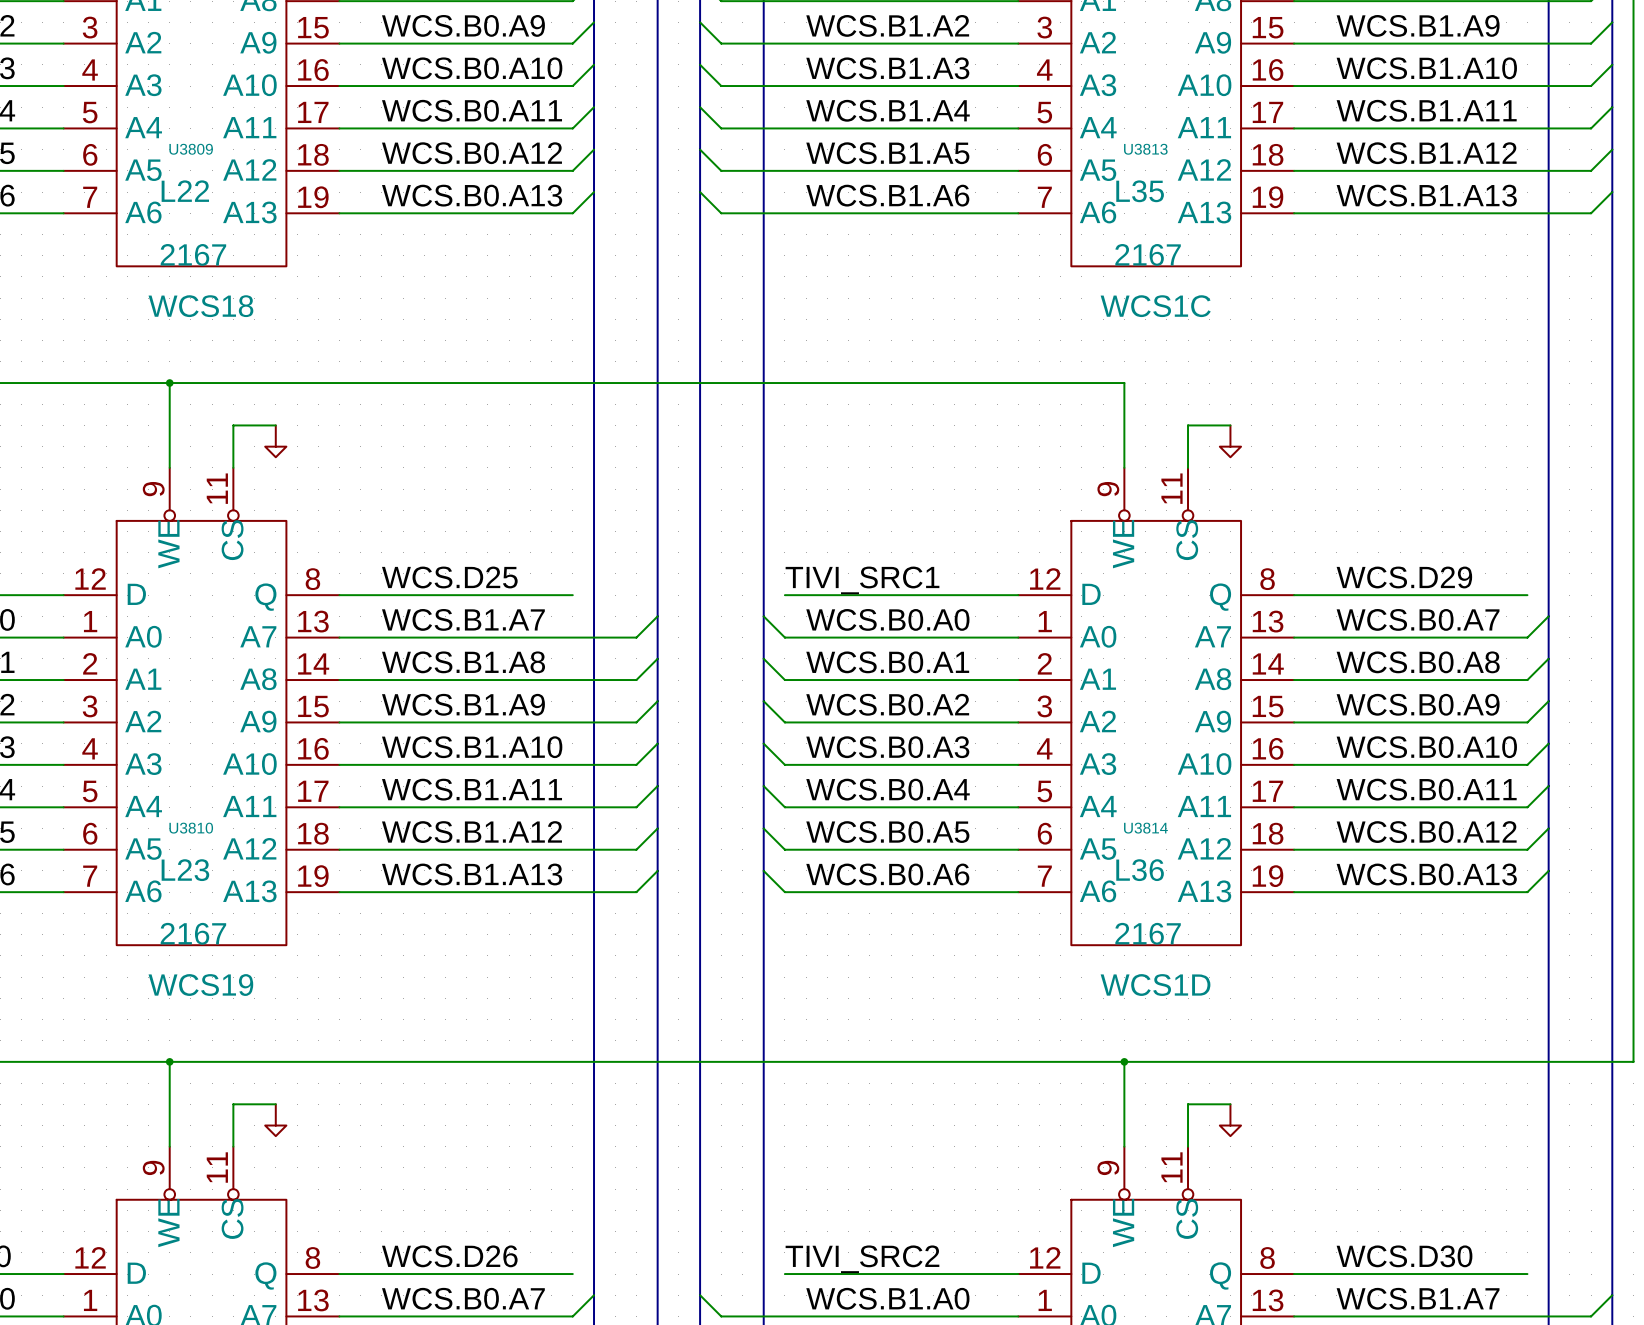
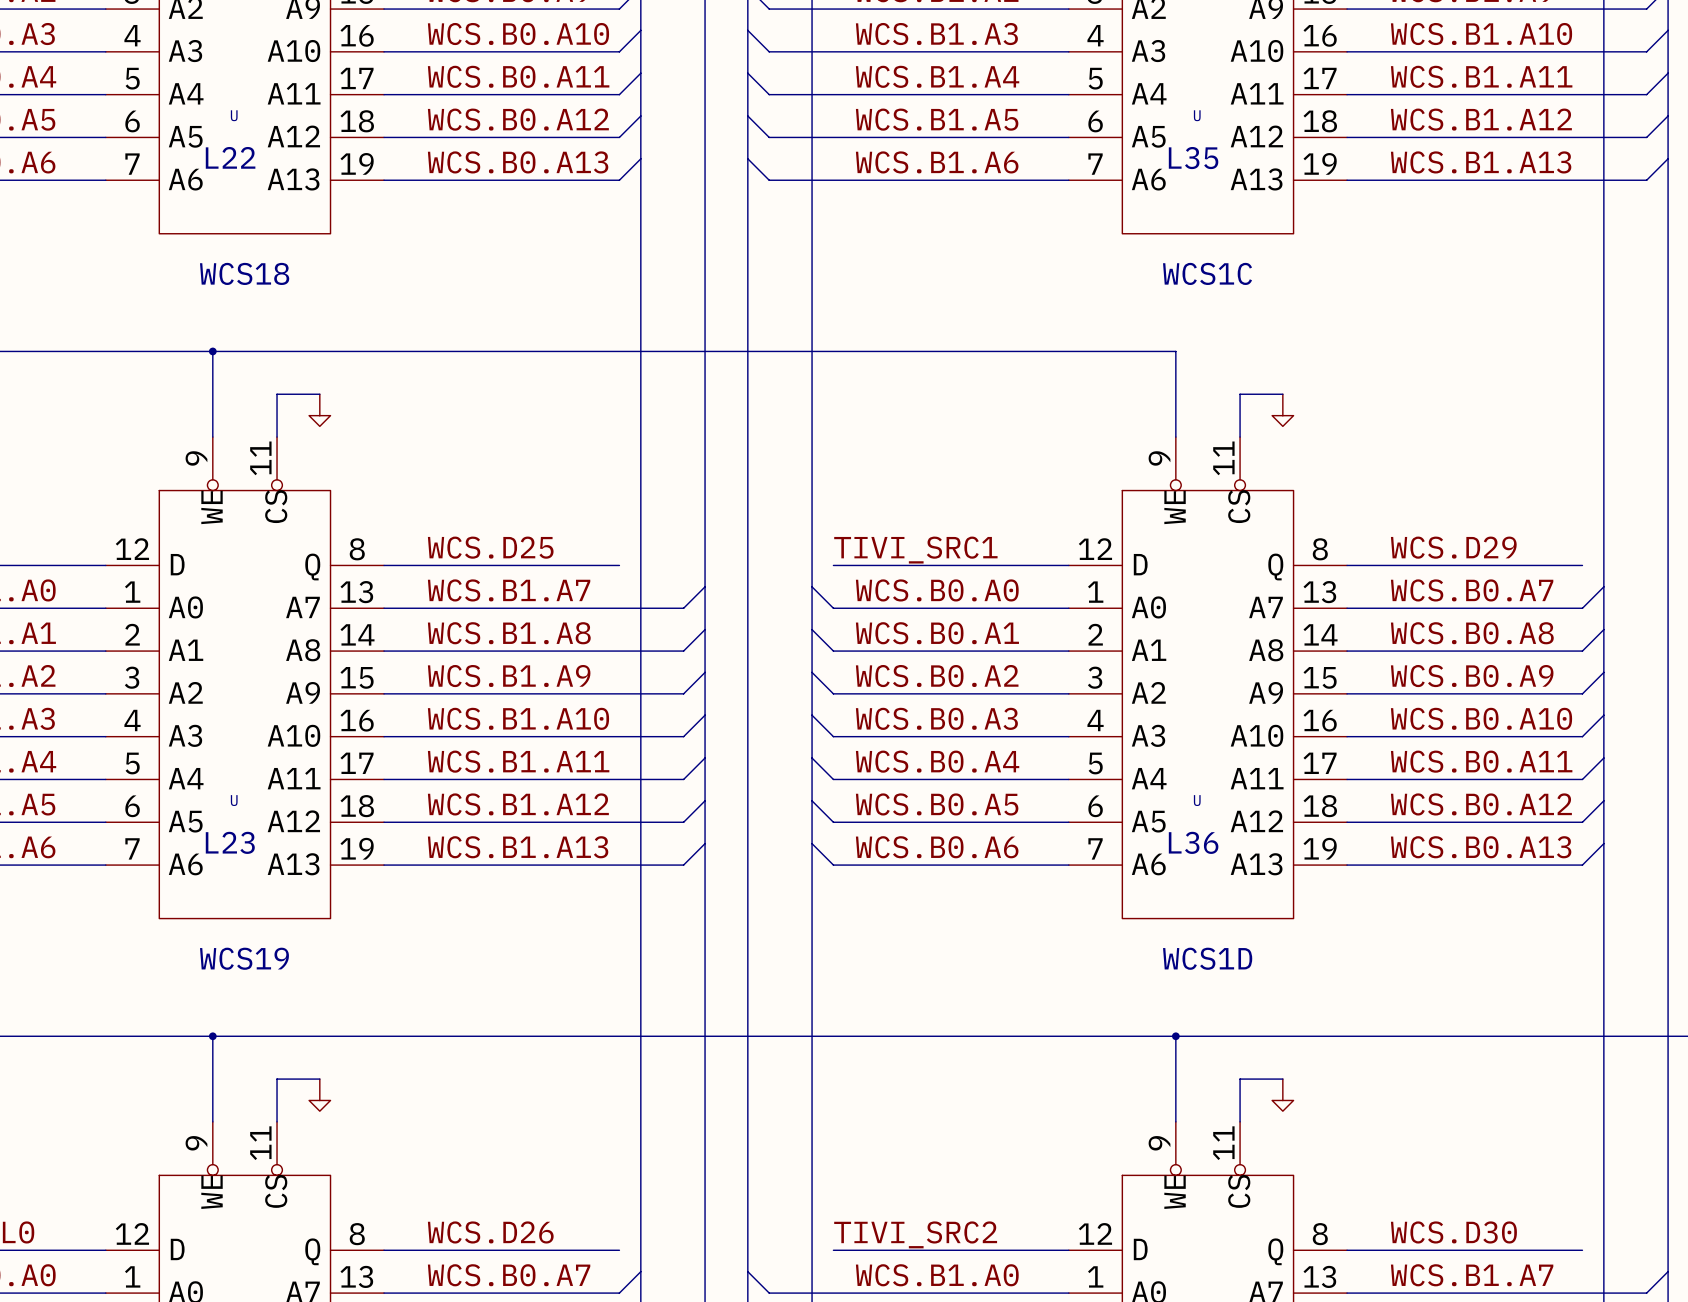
U3809 name: U3809 (191, 149) -> U (234, 115)
U3813 name: U3813 (1145, 149) -> U (1197, 115)
U3809 value: 2167 (193, 254) -> none
U3813 value: 2167 (1148, 254) -> none
U3810 name: U3810 (191, 828) -> U (234, 800)
U3814 name: U3814 (1145, 828) -> U (1197, 800)
U3810 value: 2167 (193, 933) -> none
U3814 value: 2167 (1148, 933) -> none

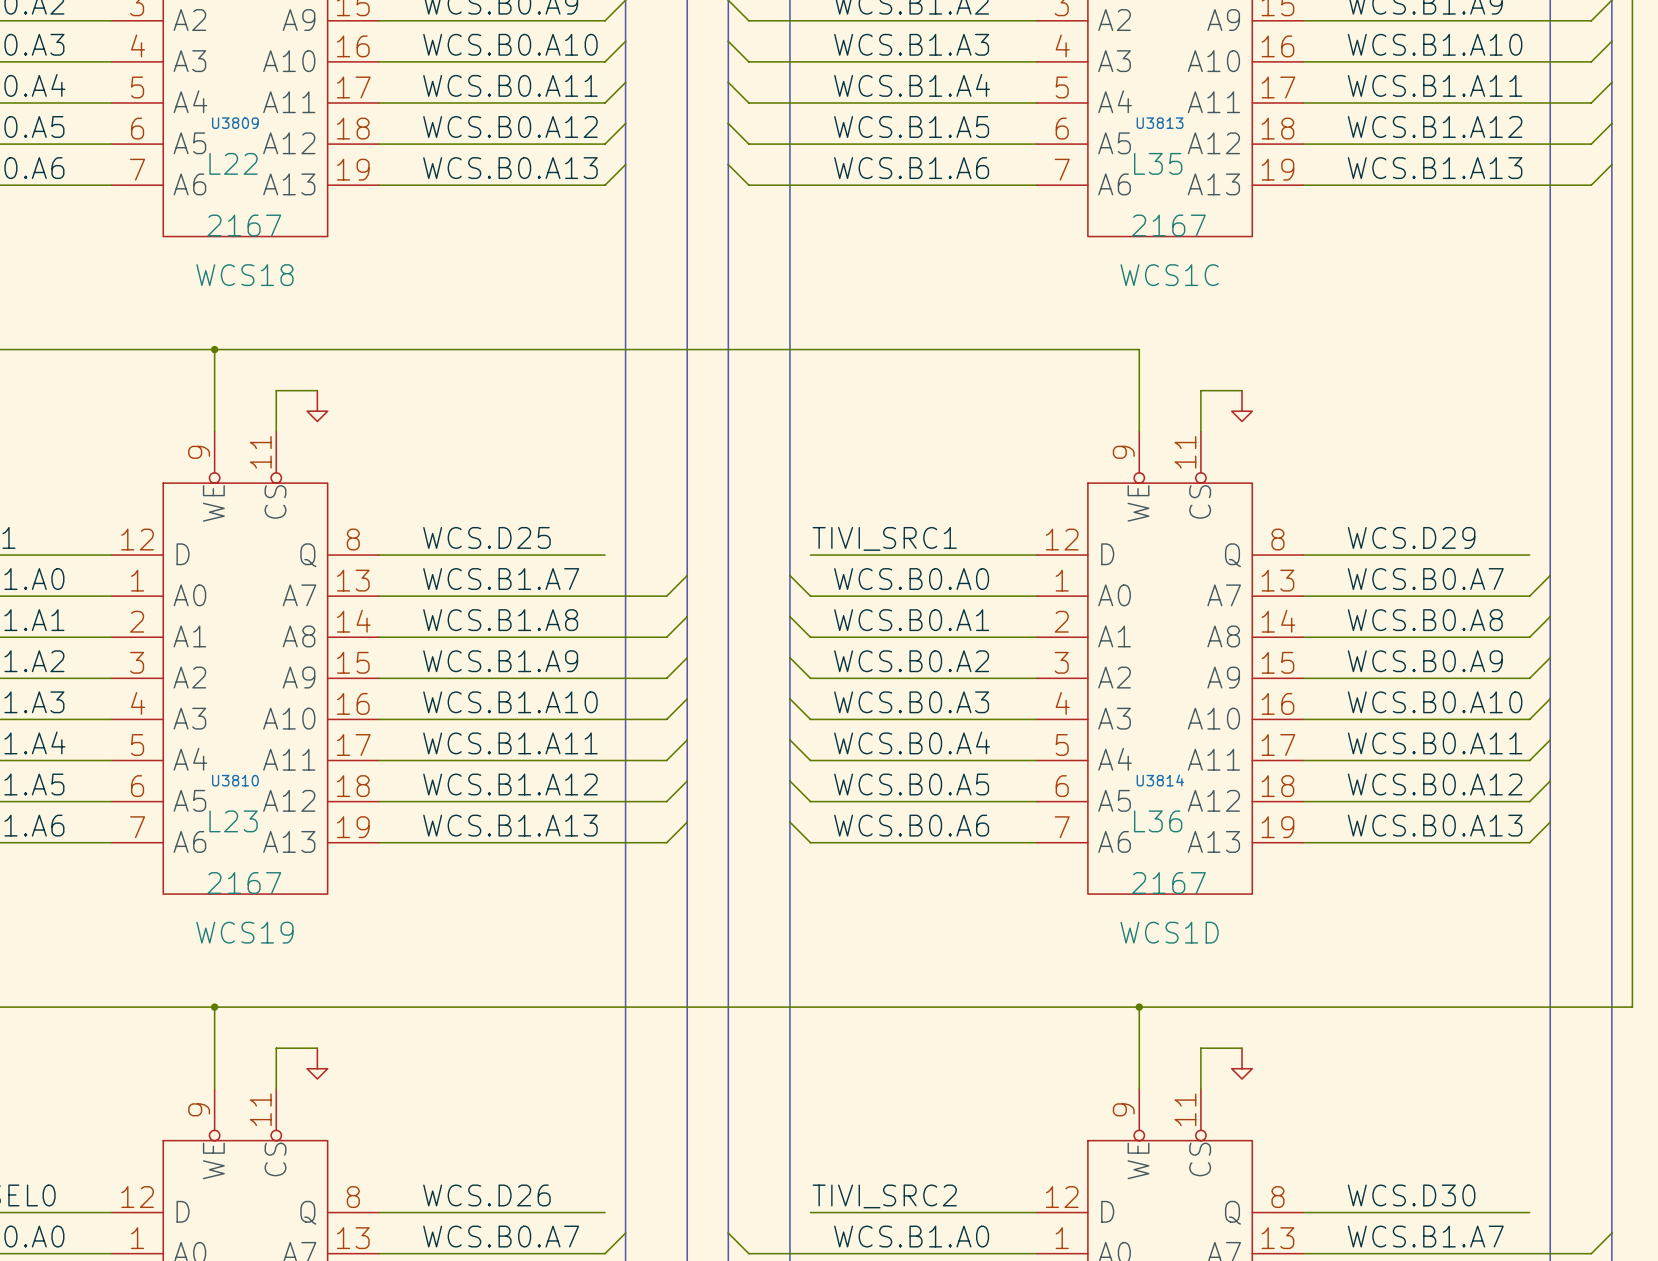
U name: U (234, 115) -> U3809 (235, 123)
U name: U (1197, 115) -> U3813 (1160, 123)
U value: none -> 2167 (244, 225)
U value: none -> 2167 (1168, 225)
U name: U (234, 800) -> U3810 (235, 780)
U name: U (1197, 800) -> U3814 (1160, 780)
U value: none -> 2167 (244, 883)
U value: none -> 2167 (1168, 883)

